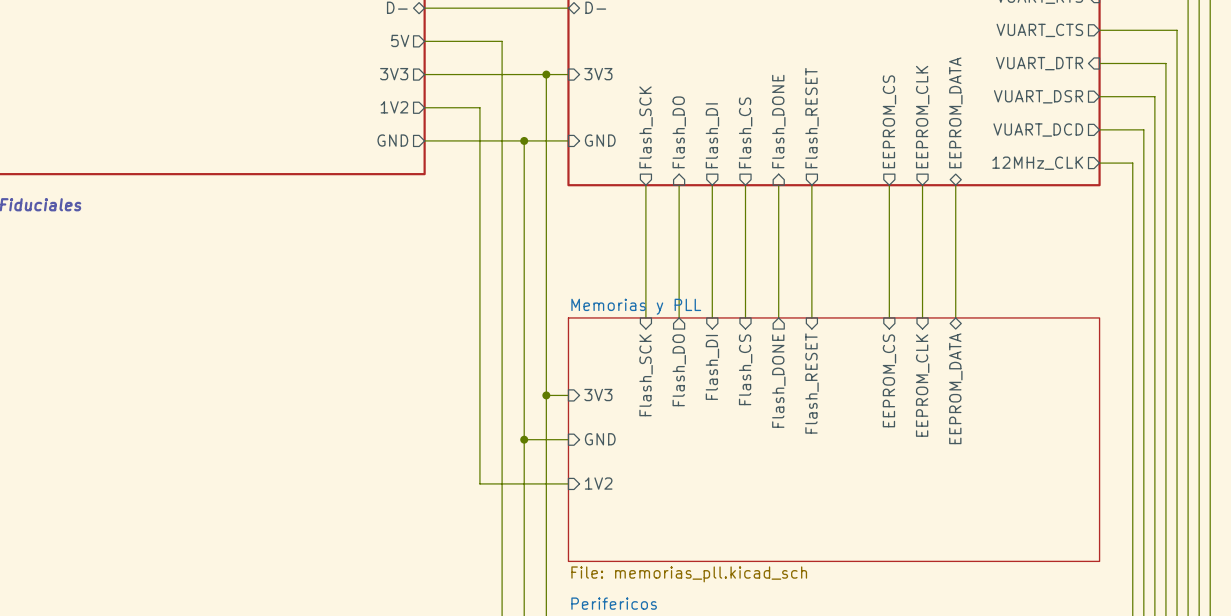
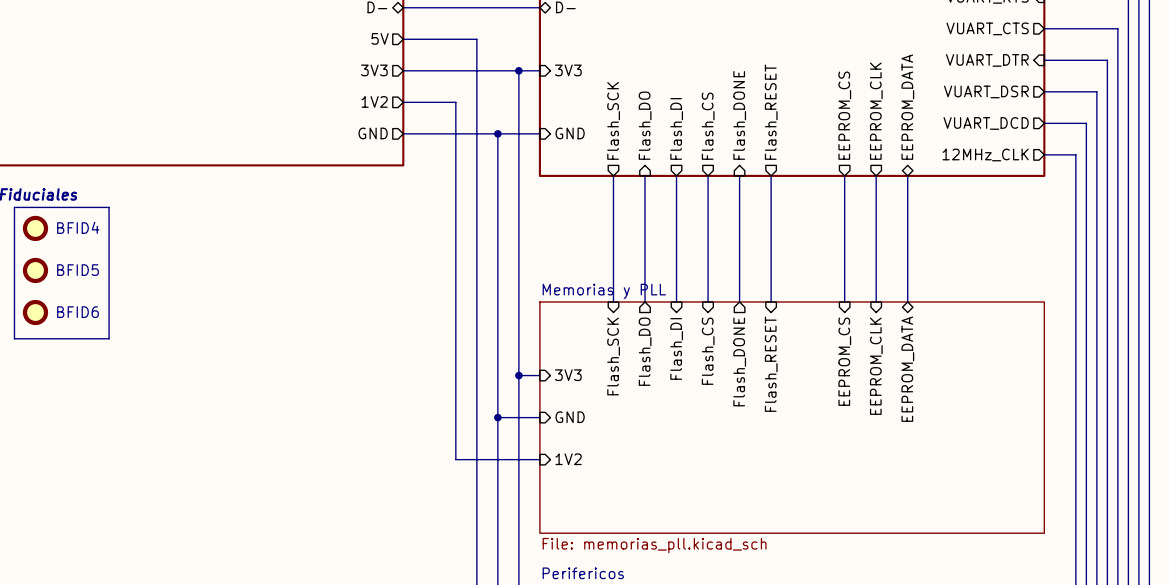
line: none -> (14, 207) (109, 207) (109, 338) (14, 338) (14, 207)
BFID4: none -> (35, 228)
BFID5: none -> (35, 270)
BFID6: none -> (35, 312)

